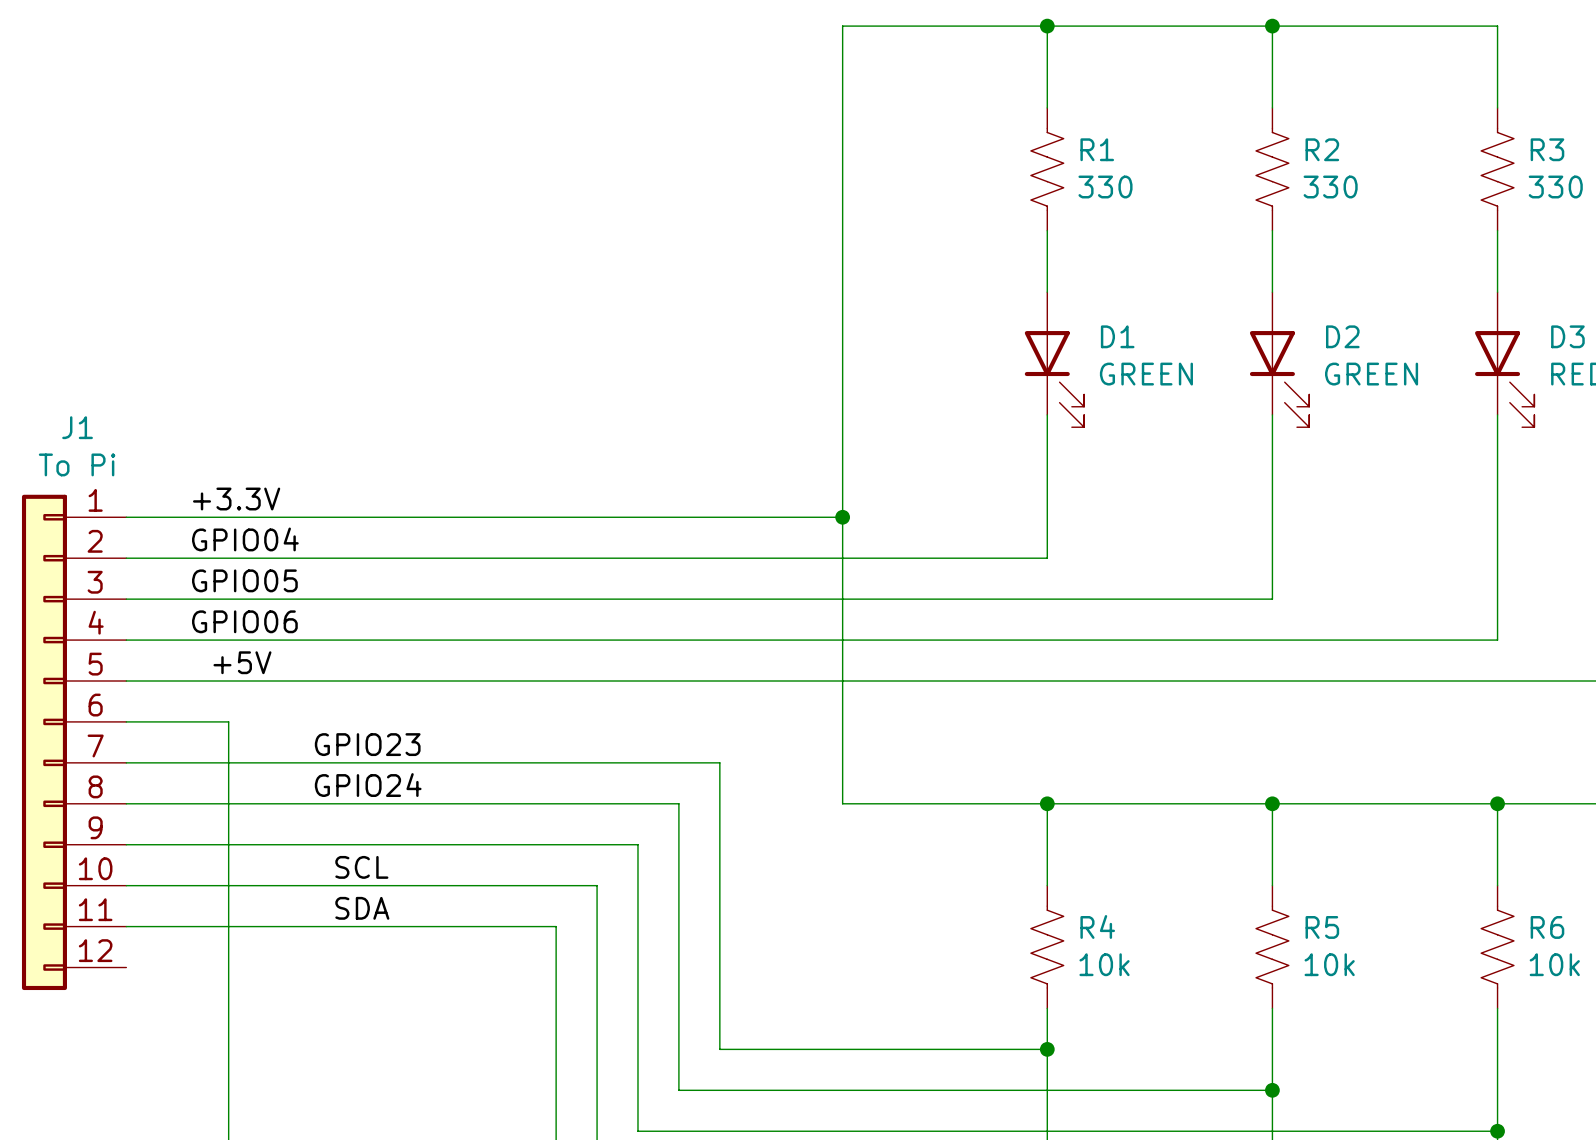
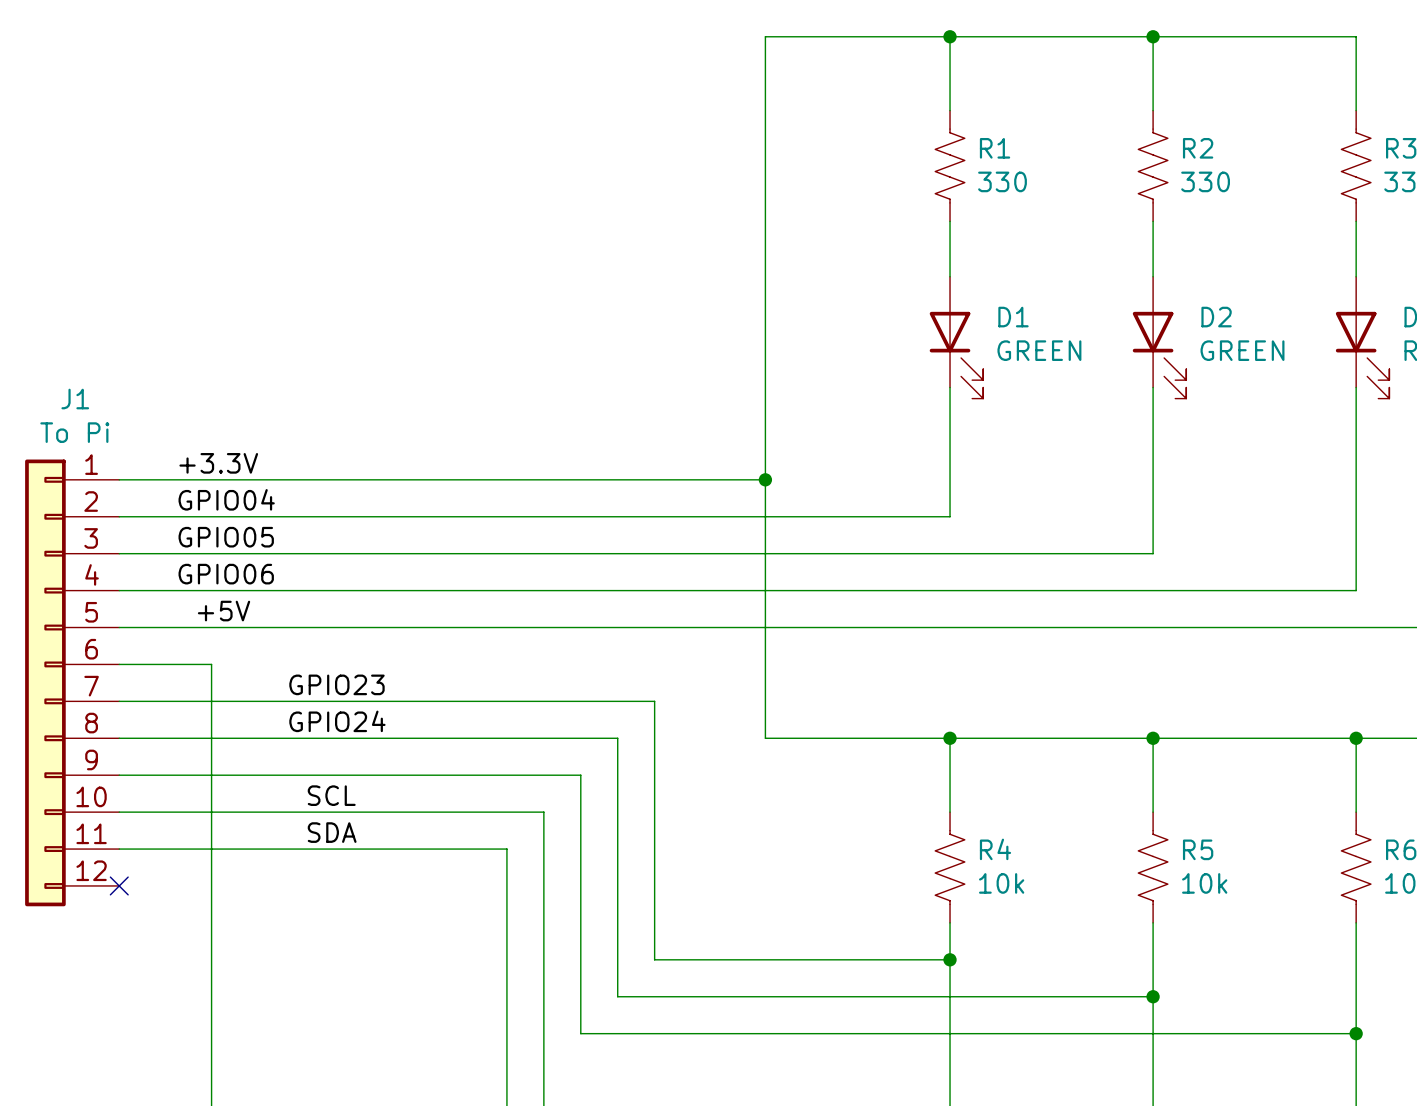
no-connect mark: none -> (119, 885)

